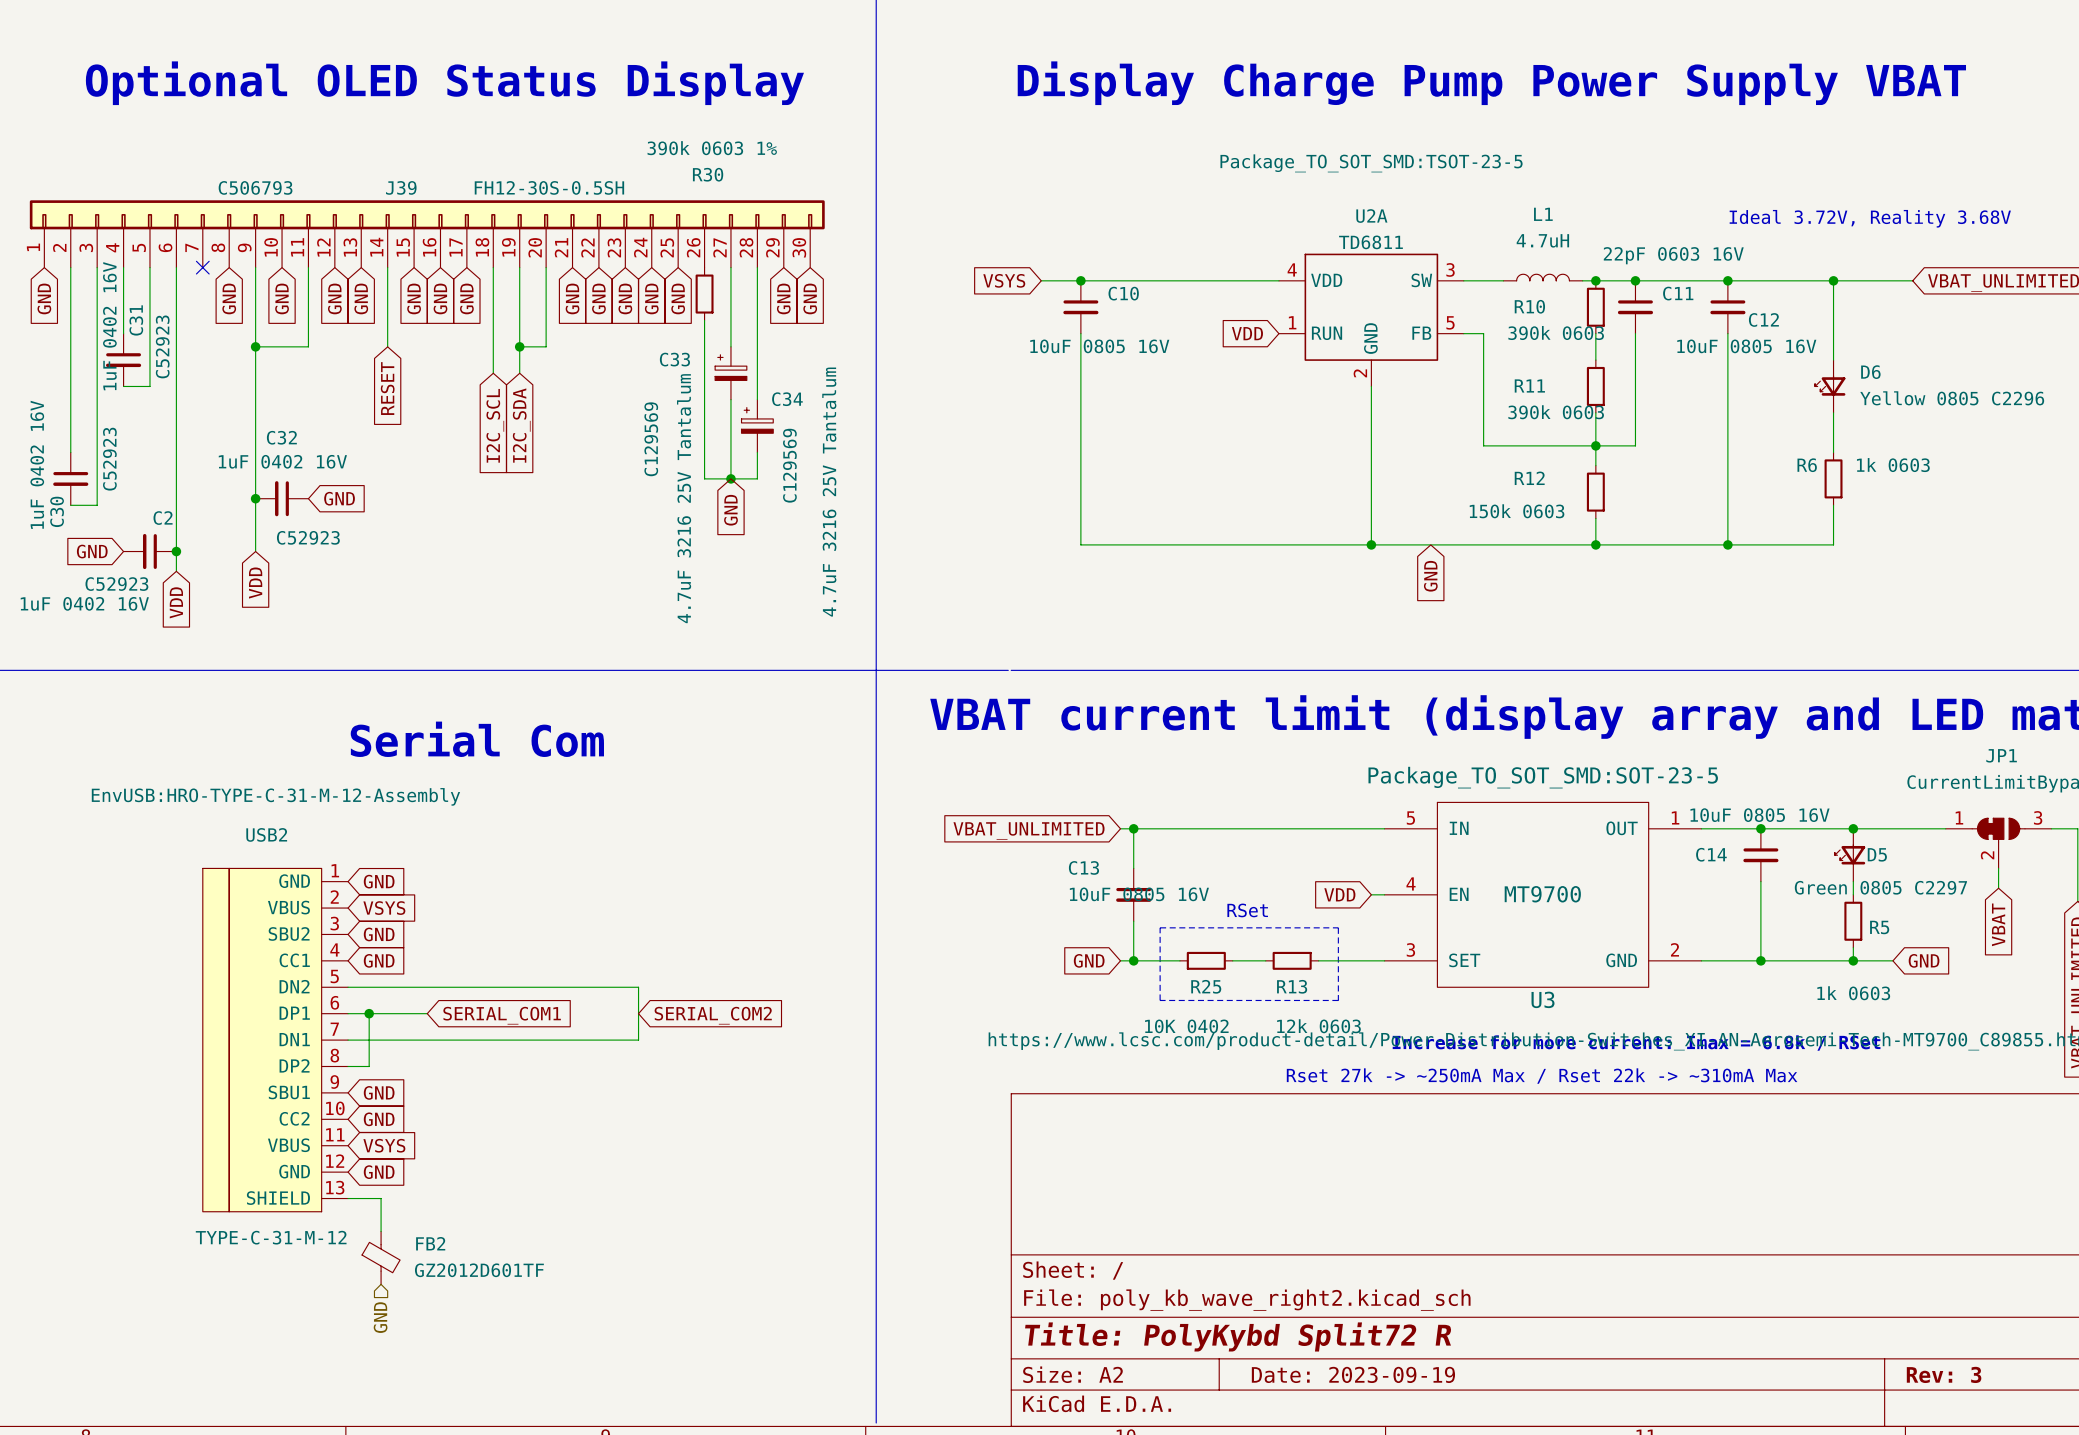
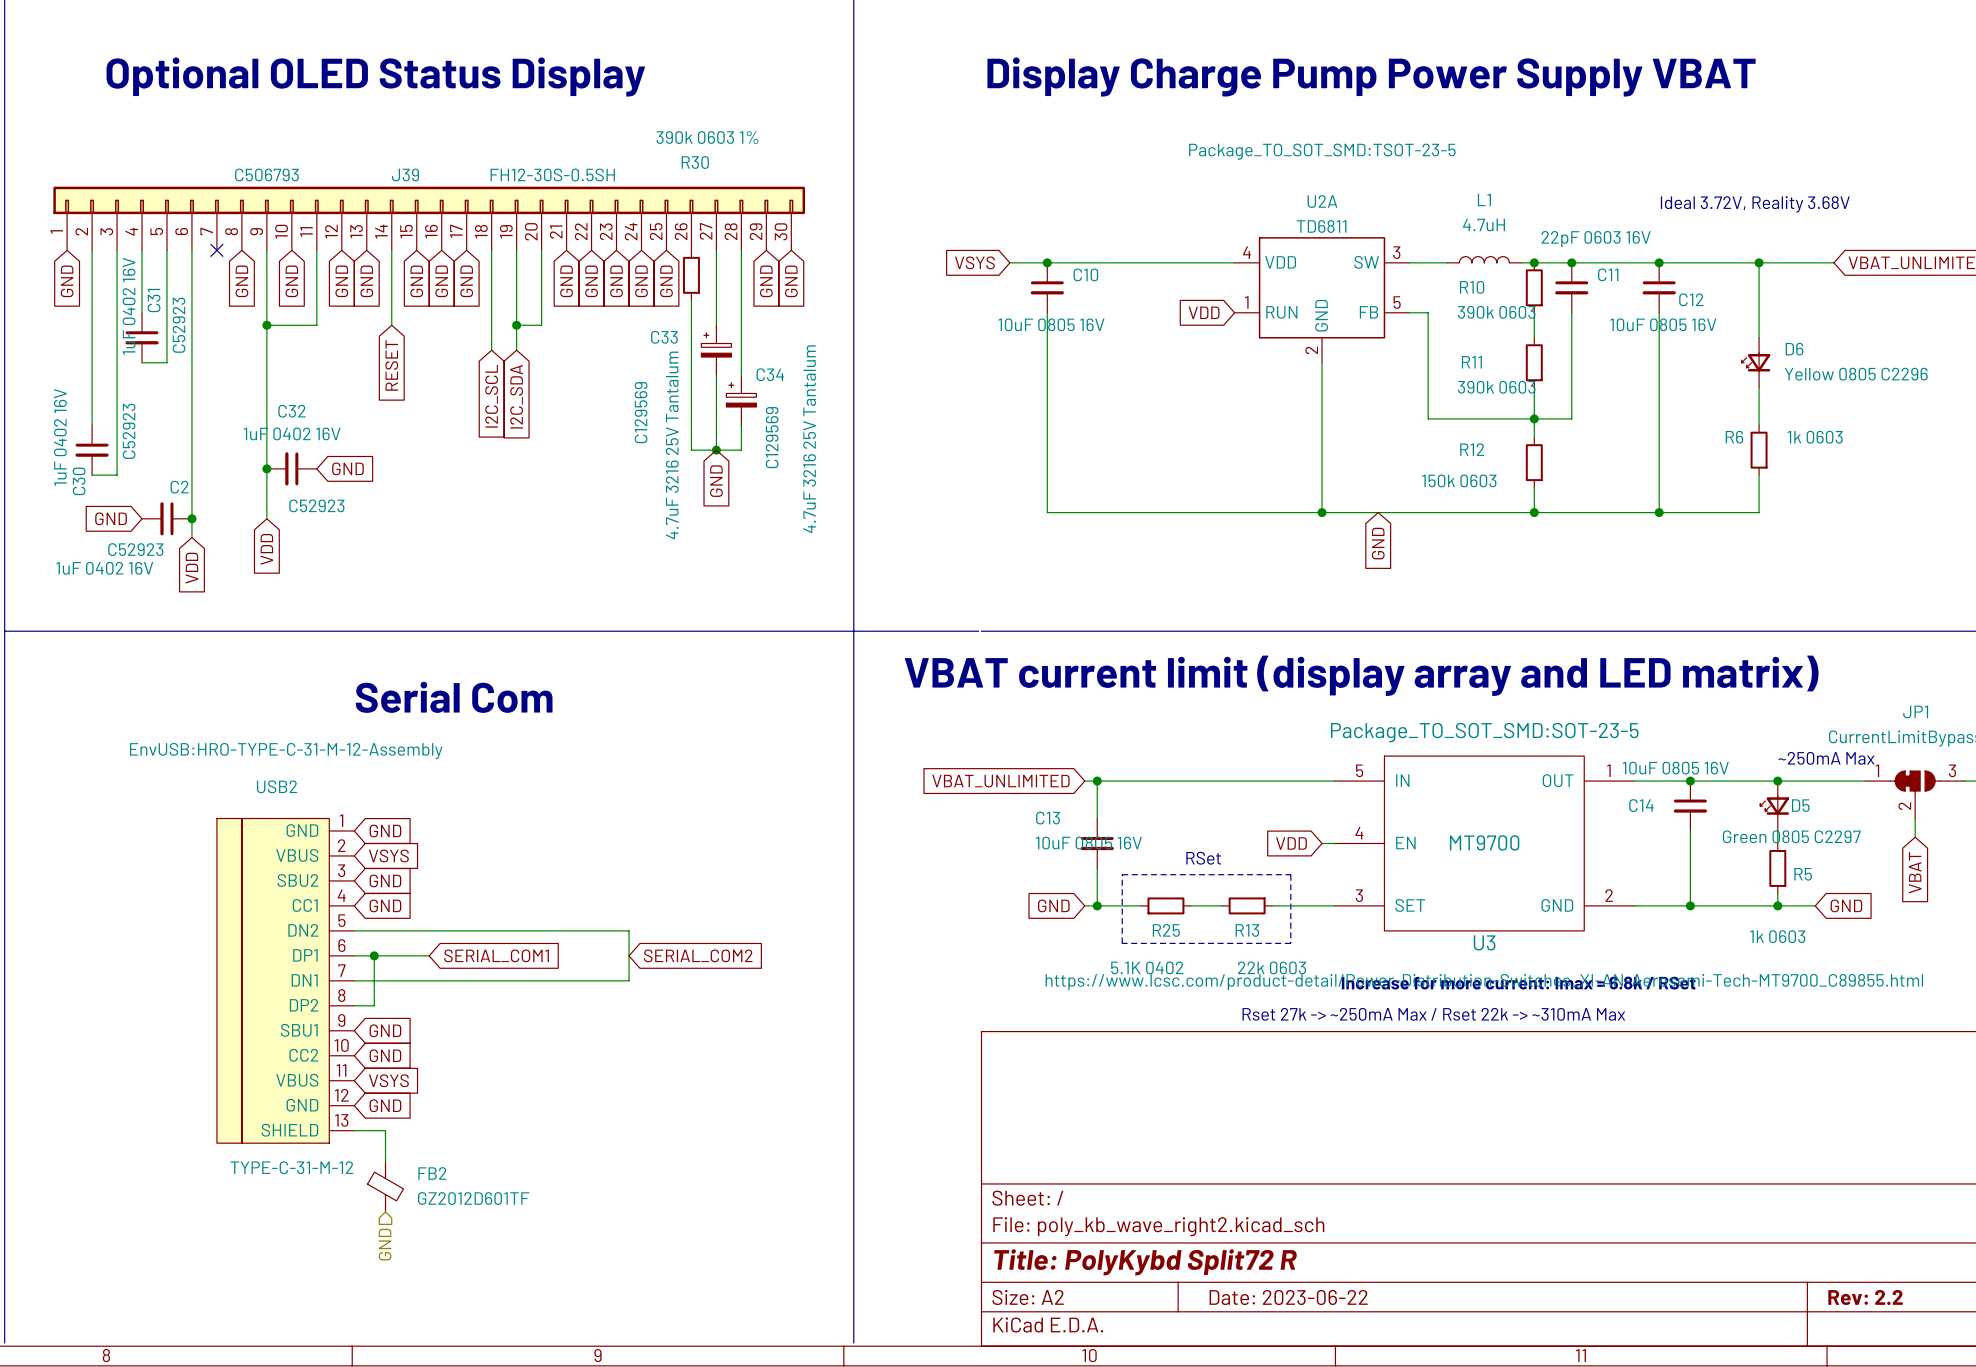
text: none -> ~250mA Max (1826, 758)
R25 value: 10K 0402 (1186, 1026) -> 5.1K 0402 (1147, 967)
R13 value: 12k 0603 (1318, 1026) -> 22k 0603 (1272, 967)
title block: Date: 2023-09-19 (1353, 1374) -> Date: 2023-06-22 (1288, 1297)
title block: Rev: 3 (1944, 1374) -> Rev: 2.2 (1865, 1297)

